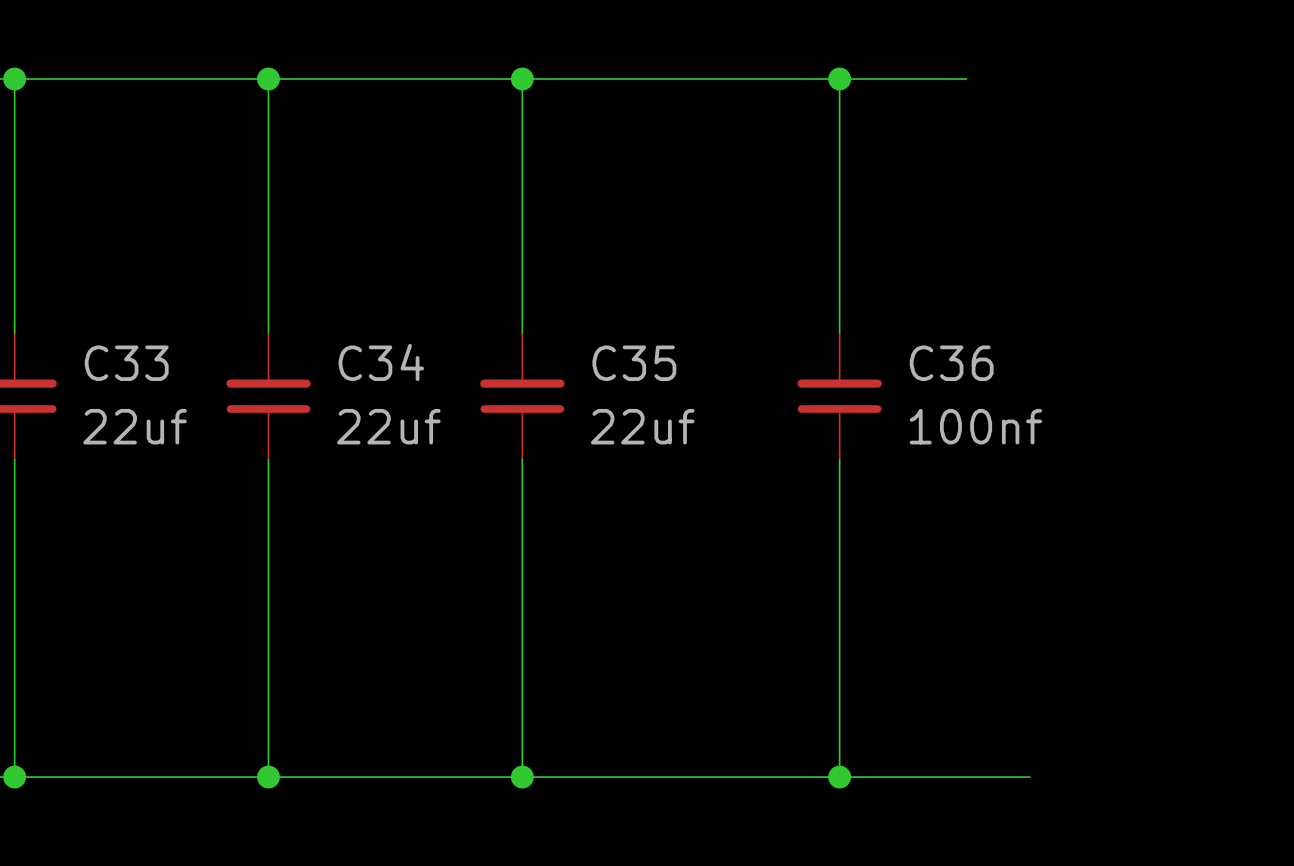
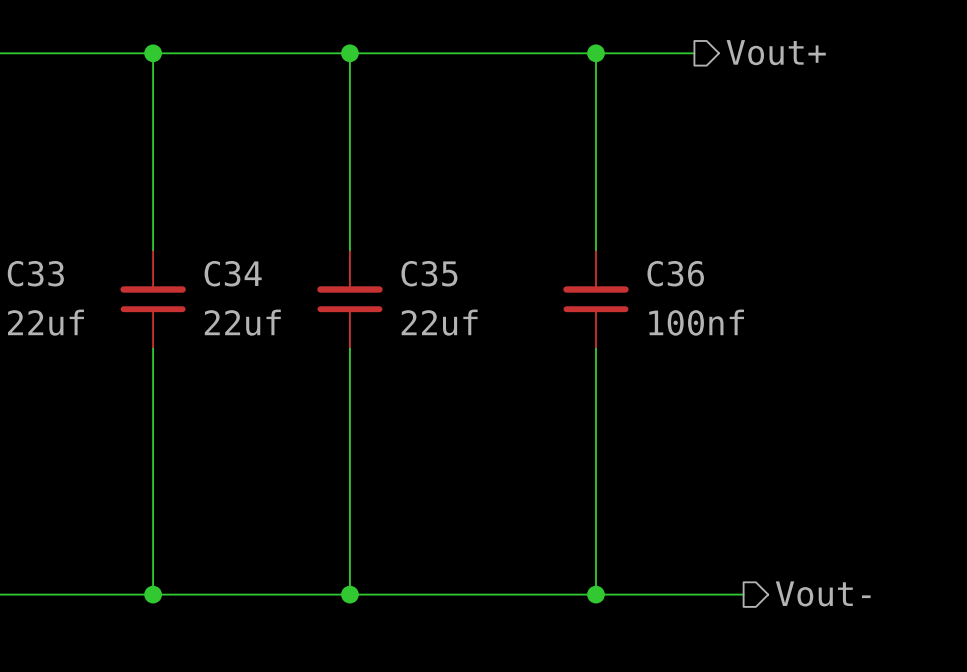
hierarchical label: none -> Vout+ (776, 52)
hierarchical label: none -> Vout- (823, 593)

